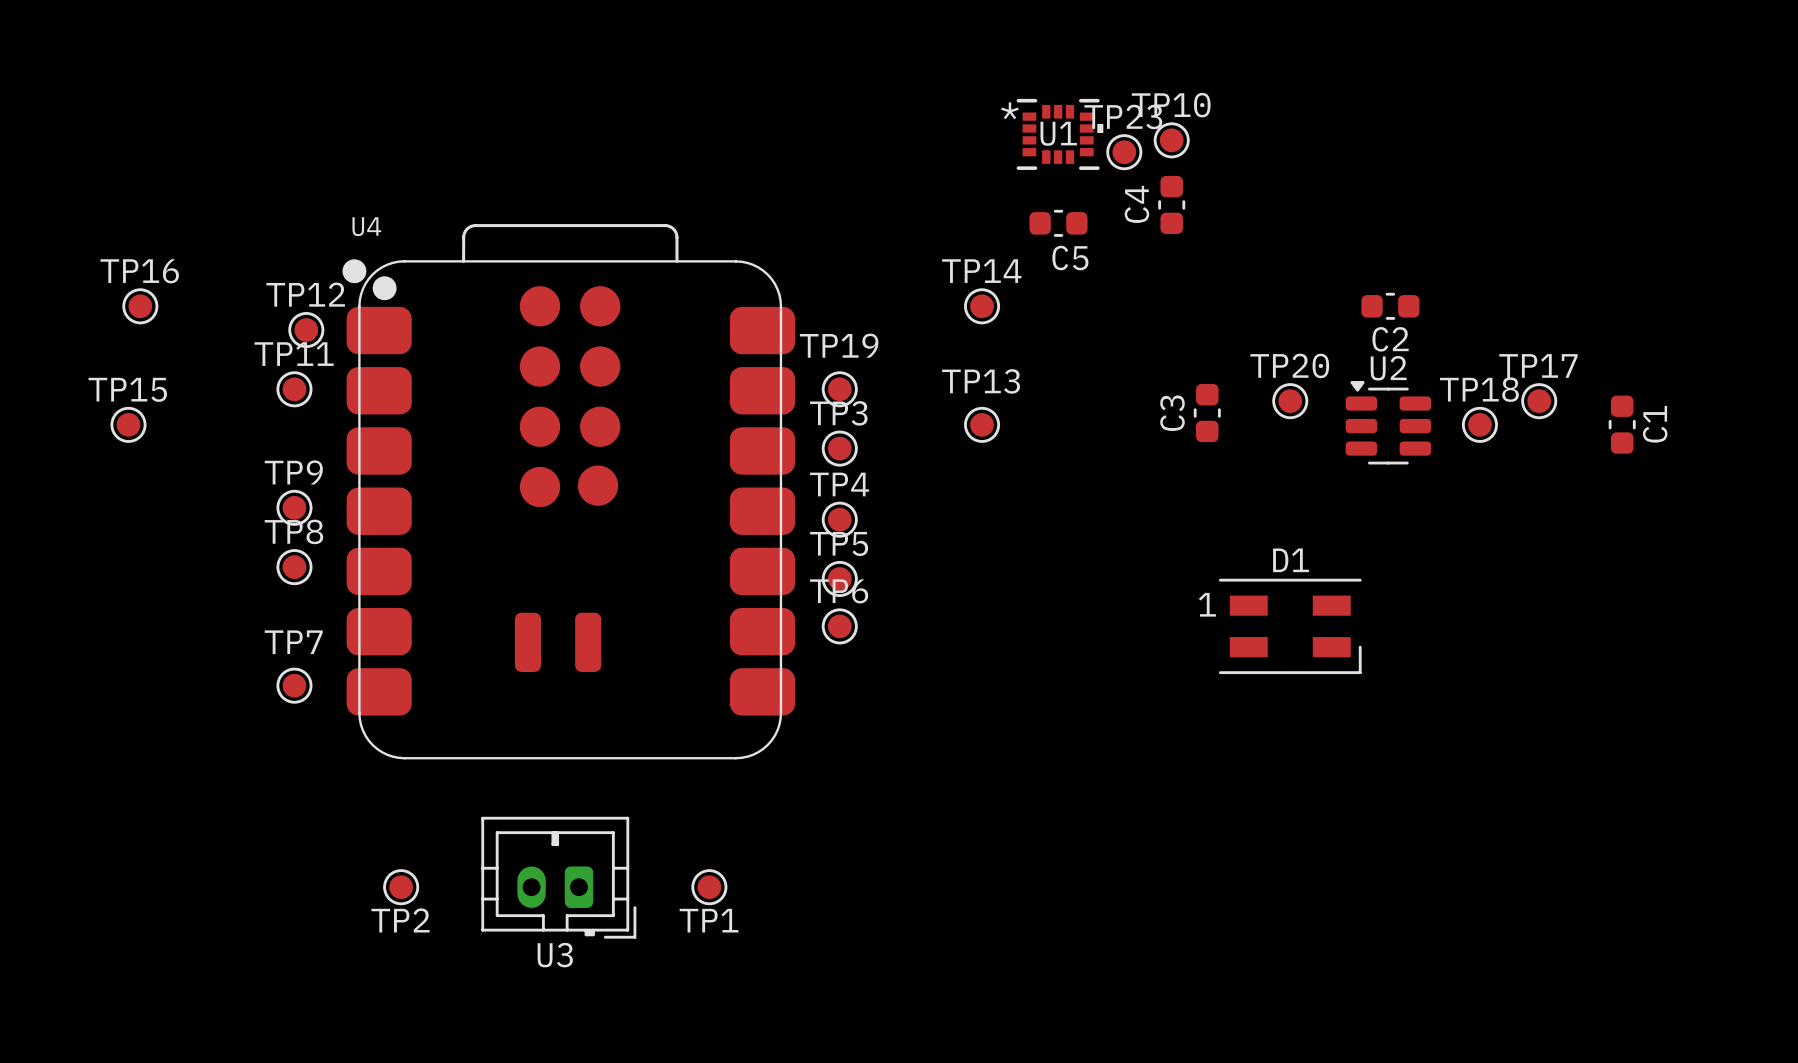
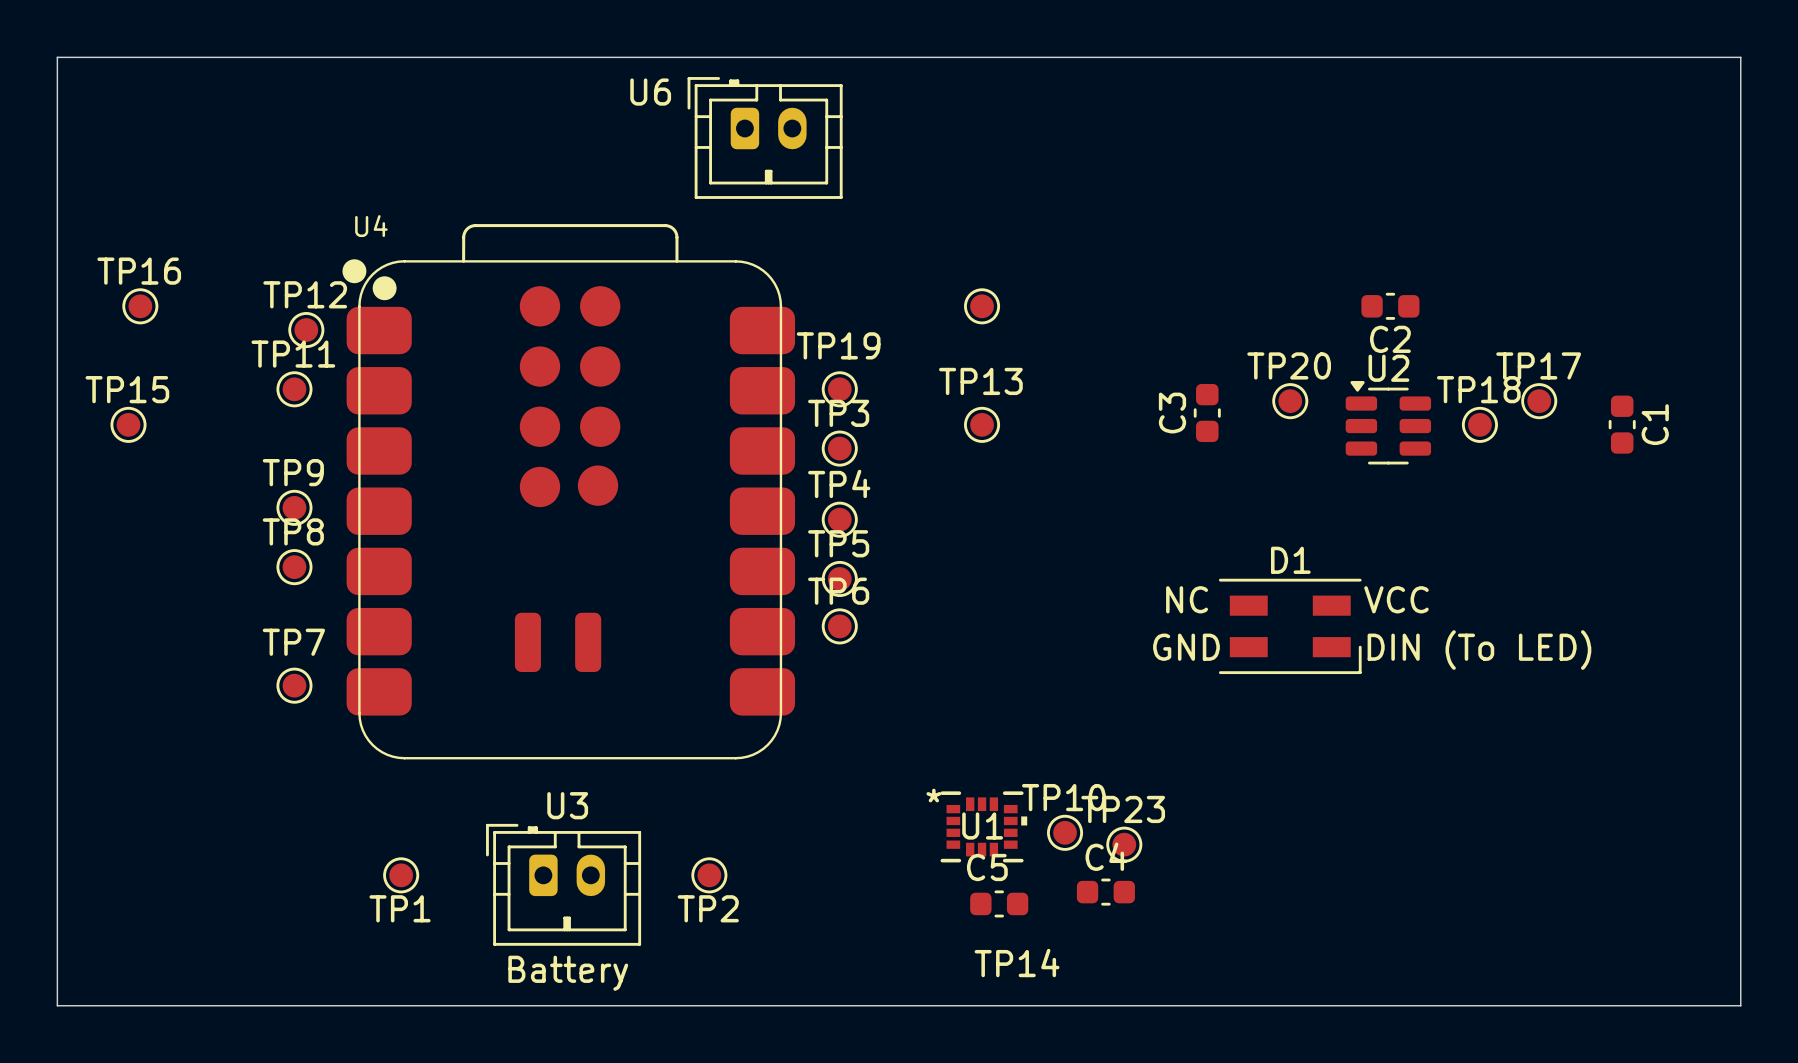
board edge: none -> (57, 57) (1740, 57) (1740, 1005) (57, 1005) (57, 57)
U1 position: (1059, 134) -> (983, 826)
U6: none -> (765, 137)
TP10 position: (1171, 140) -> (1065, 832)
TP23 position: (1124, 152) -> (1124, 844)
C4 rotation: 0° (1171, 204) -> 90° clockwise (1105, 892)
C4 position: (1171, 204) -> (1105, 892)
C5 position: (1058, 223) -> (999, 903)
C5 name position: C5 (1070, 258) -> C5 (987, 867)
TP14 name position: TP14 (981, 271) -> TP14 (1017, 963)
text: none -> NC (1187, 599)
text: none -> VCC (1396, 599)
D1 text: 1 (1207, 604) -> none
text: none -> GND (1186, 647)
text: none -> DIN (To LED) (1479, 650)
U3 rotation: 0° (558, 877) -> 180° (563, 884)
TP2 position: (401, 887) -> (709, 875)
TP1 position: (709, 887) -> (401, 875)
U3 value: none -> Battery (568, 973)

